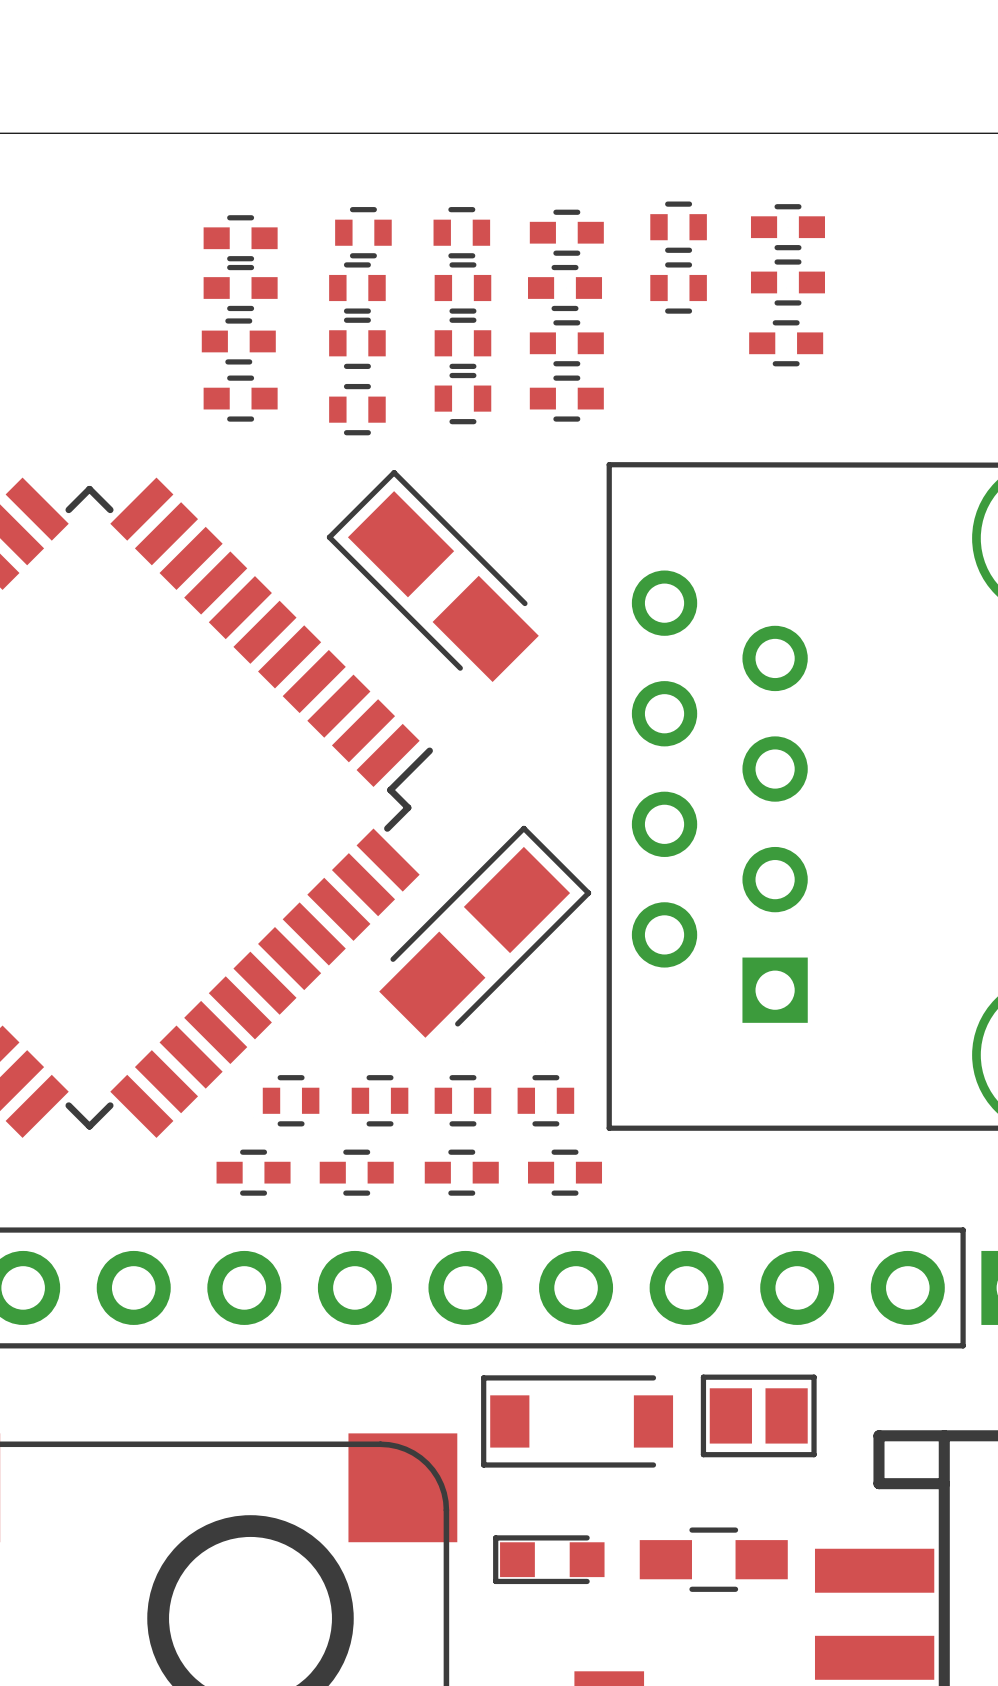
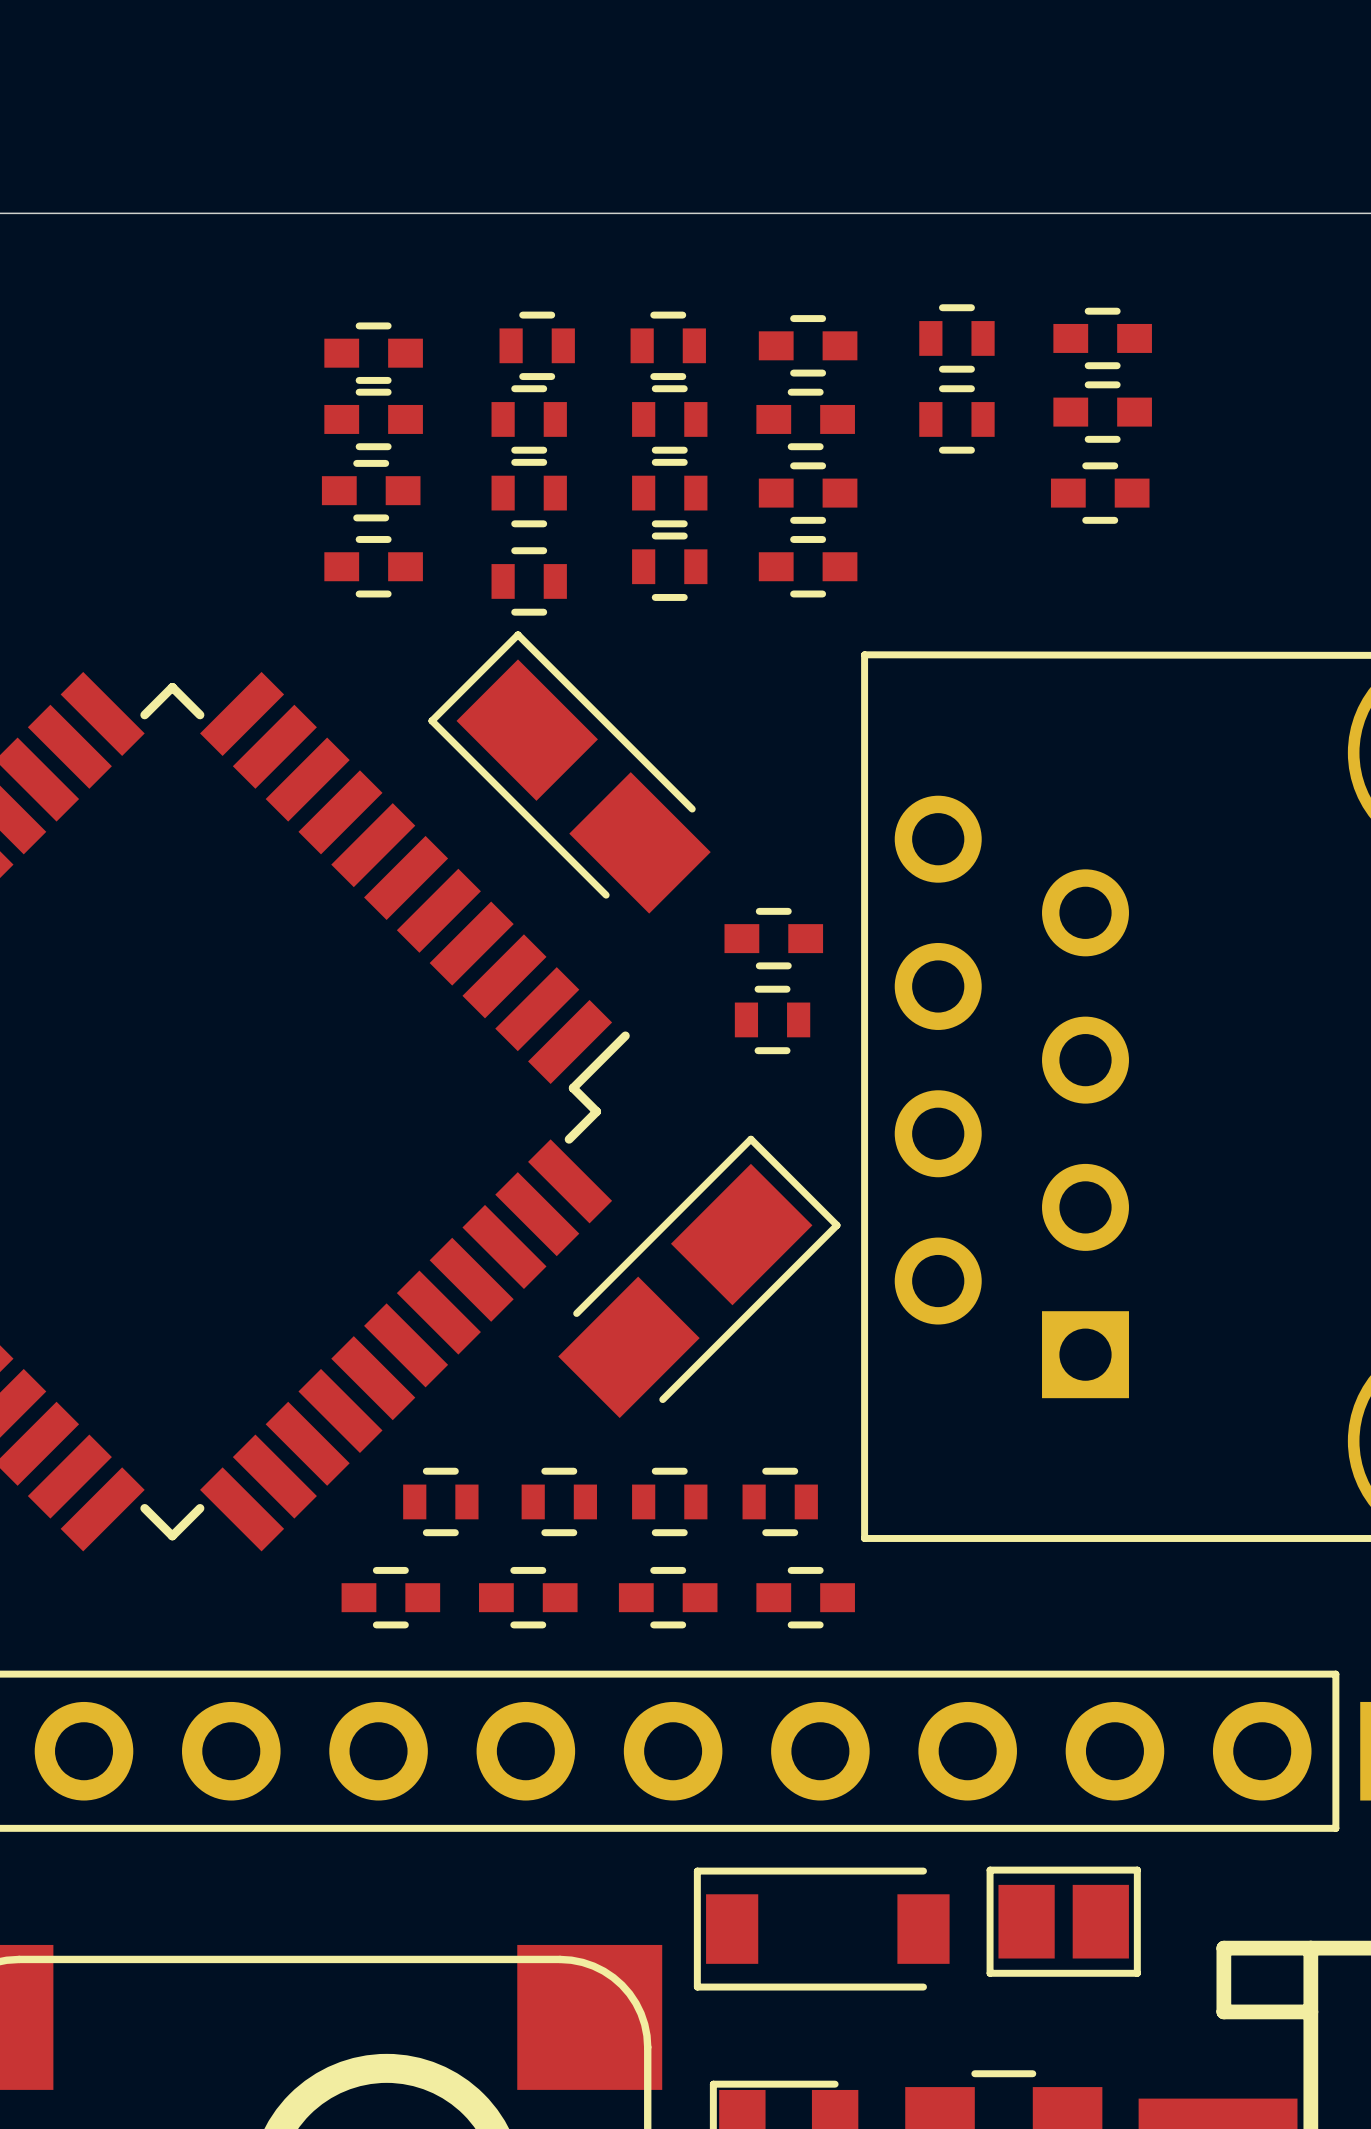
part position: (432, 576) -> (569, 772)
part: none -> (773, 938)
part: none -> (772, 1019)

